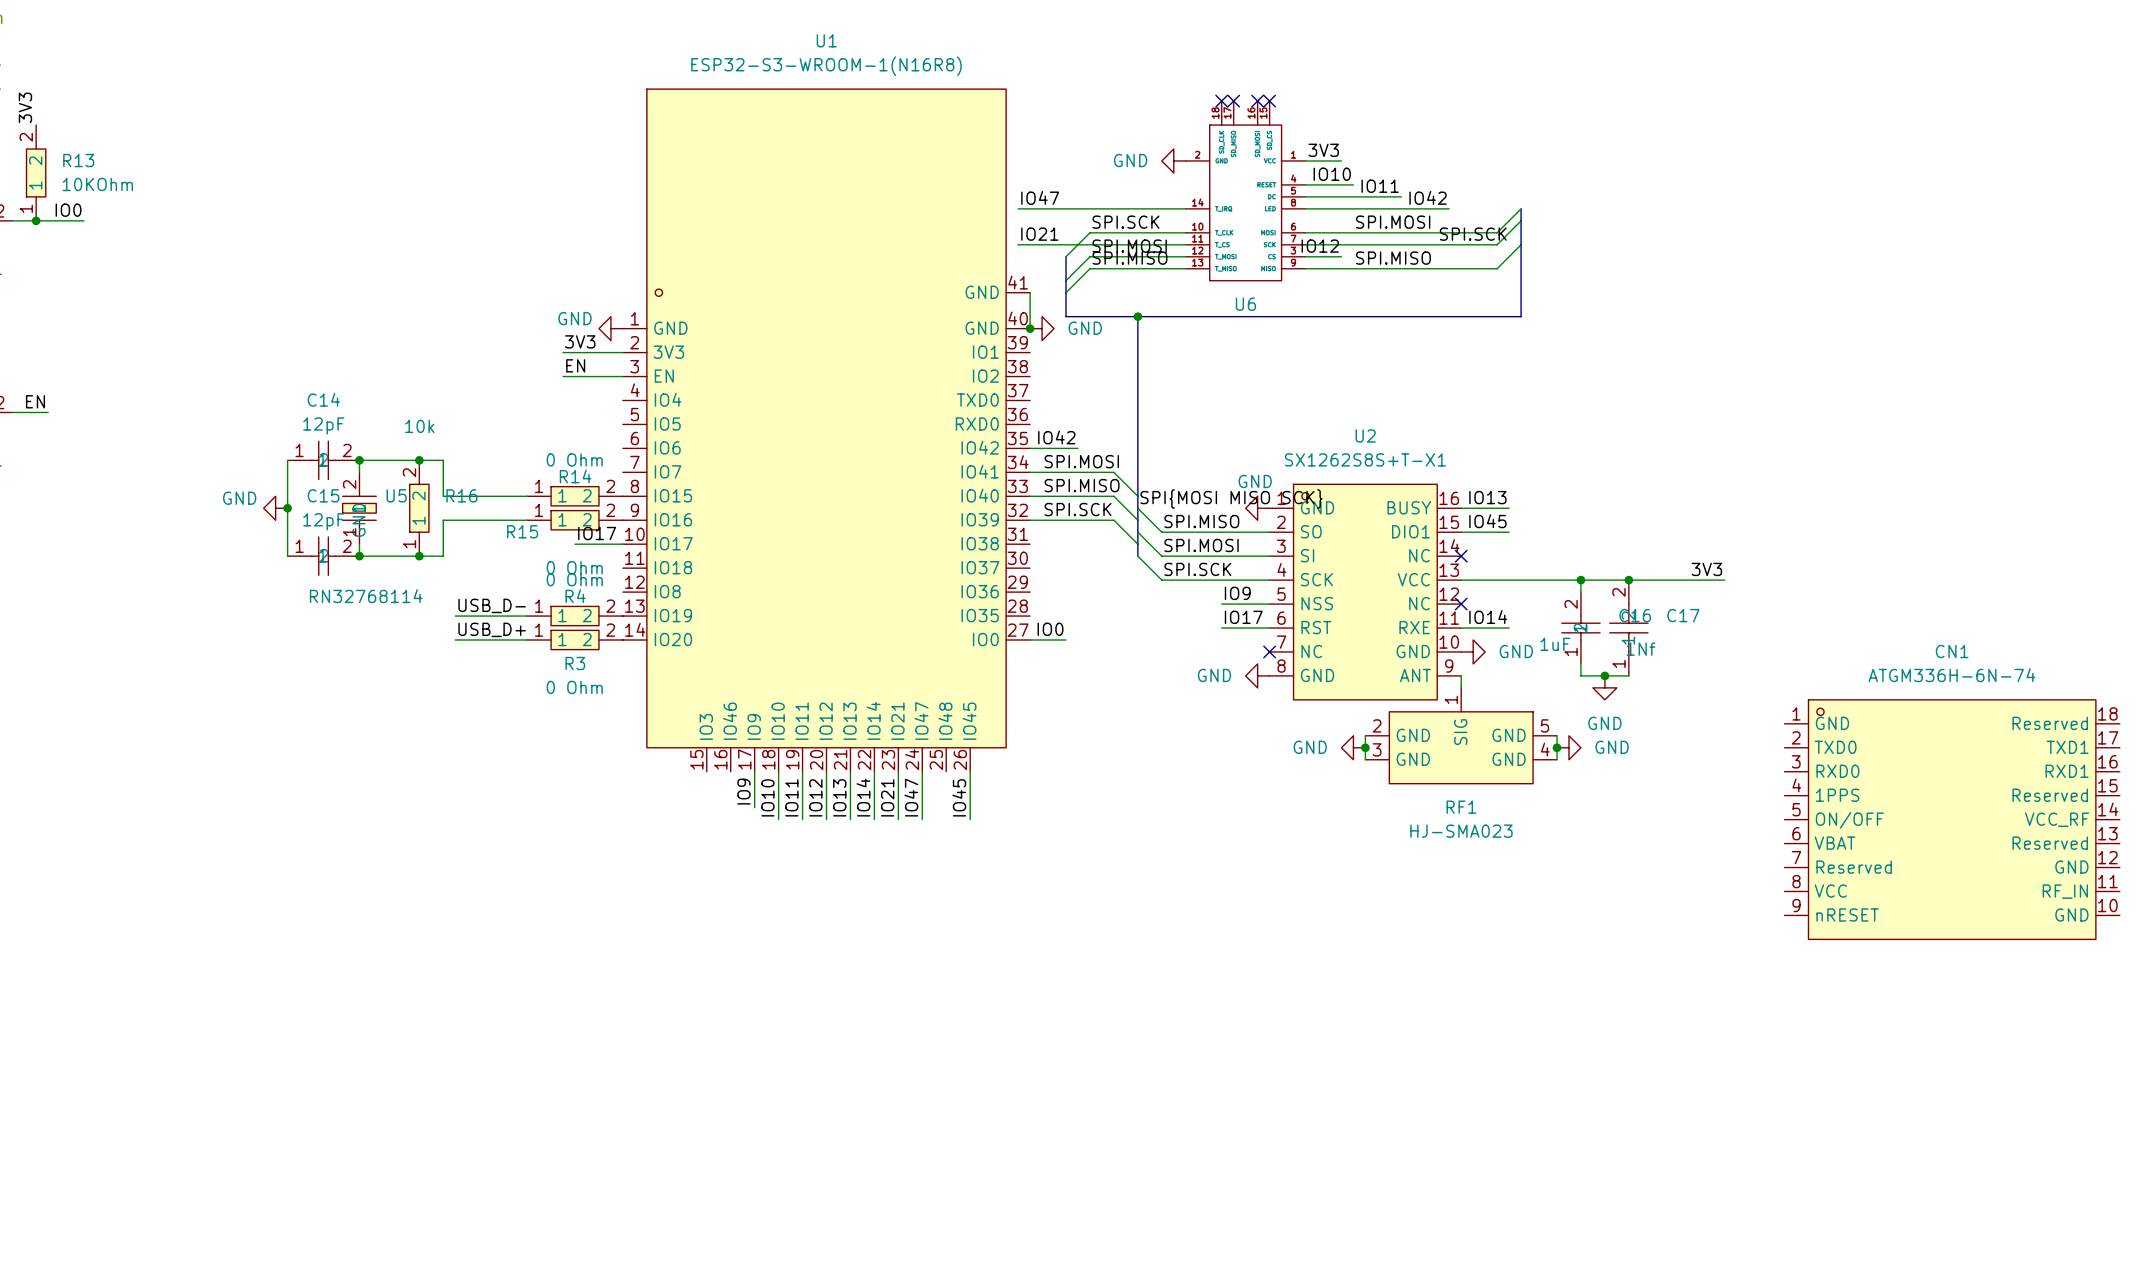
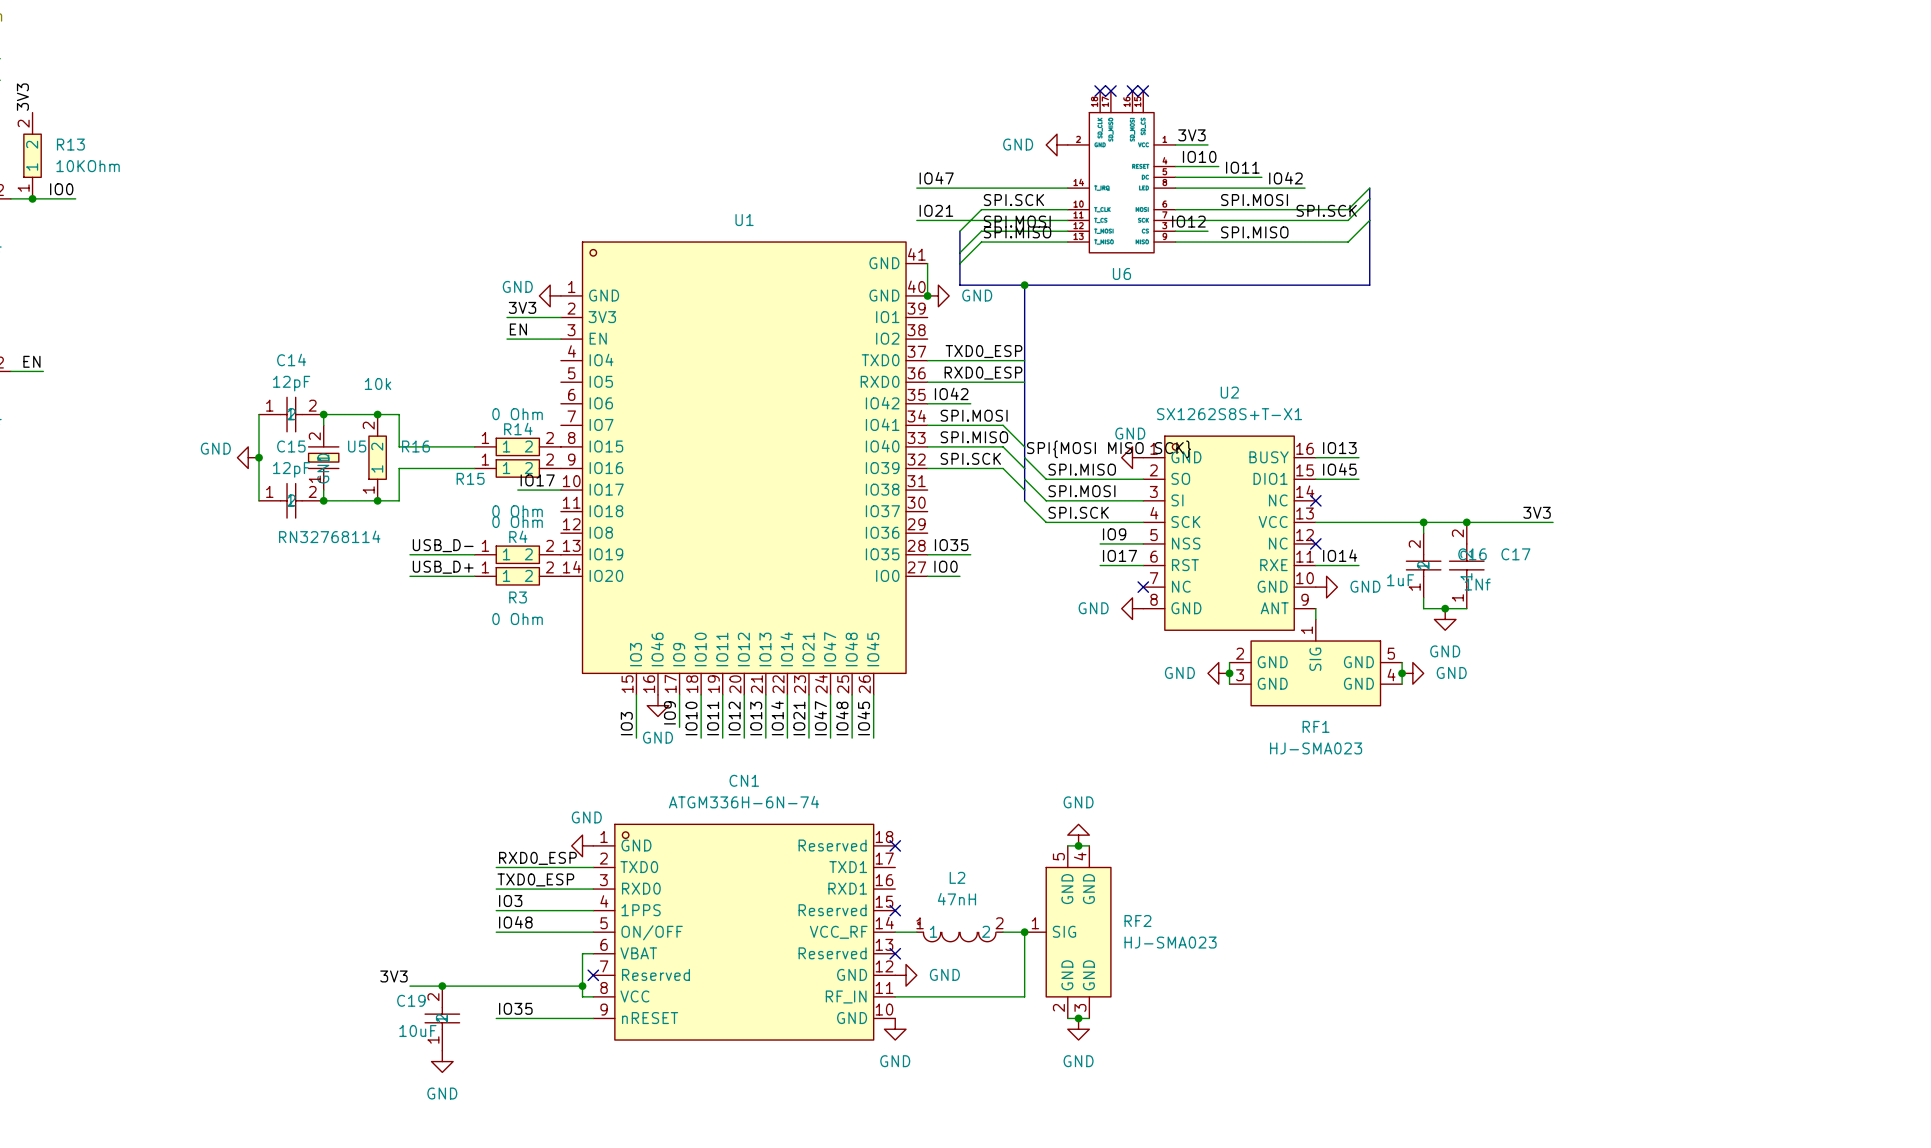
U1 name position: U1 (826, 40) -> U1 (744, 220)
U1 value: ESP32-S3-WROOM-1(N16R8) (826, 66) -> none
U1 symbol: [622, 89, 1031, 772] -> [560, 242, 928, 695]
label: none -> TXD0_ESP (984, 351)
wire: none -> (927, 360) (1024, 360)
label: none -> RXD0_ESP (983, 373)
wire: none -> (927, 382) (1024, 382)
label: none -> IO35 (951, 545)
wire: none -> (927, 554) (970, 554)
wire: none -> (636, 694) (636, 738)
wire: none -> (852, 694) (852, 738)
power symbol: none -> GND (658, 705)
label: none -> IO48 (842, 718)
label: none -> IO3 (626, 723)
CN1 position: (1952, 819) -> (744, 932)
power symbol: none -> GND (1078, 835)
power symbol: none -> GND (582, 845)
no-connect mark: none -> (895, 845)
wire: none -> (1067, 845) (1089, 845)
junction: none -> (1078, 845)
label: none -> RXD0_ESP (537, 858)
wire: none -> (496, 867) (593, 867)
label: none -> TXD0_ESP (535, 879)
wire: none -> (496, 889) (593, 889)
label: none -> IO3 (510, 900)
wire: none -> (496, 910) (593, 910)
no-connect mark: none -> (895, 910)
label: none -> IO48 (515, 922)
wire: none -> (496, 932) (593, 932)
wire: none -> (895, 932) (916, 932)
L2: none -> 47nH (959, 932)
wire: none -> (1003, 932) (1024, 932) (1024, 996) (895, 996)
junction: none -> (1024, 932)
RF2: none -> HJ-SMA023 (1067, 932)
wire: none -> (593, 953) (582, 953) (582, 996) (593, 996)
no-connect mark: none -> (895, 953)
no-connect mark: none -> (593, 975)
power symbol: none -> GND (906, 975)
label: none -> 3V3 (393, 976)
wire: none -> (409, 986) (582, 986)
junction: none -> (442, 986)
junction: none -> (582, 986)
label: none -> IO35 (515, 1008)
C19: none -> 10uF (442, 1018)
wire: none -> (496, 1018) (593, 1018)
wire: none -> (1067, 1018) (1089, 1018)
junction: none -> (1078, 1018)
power symbol: none -> GND (895, 1029)
power symbol: none -> GND (1078, 1029)
power symbol: none -> GND (442, 1061)

